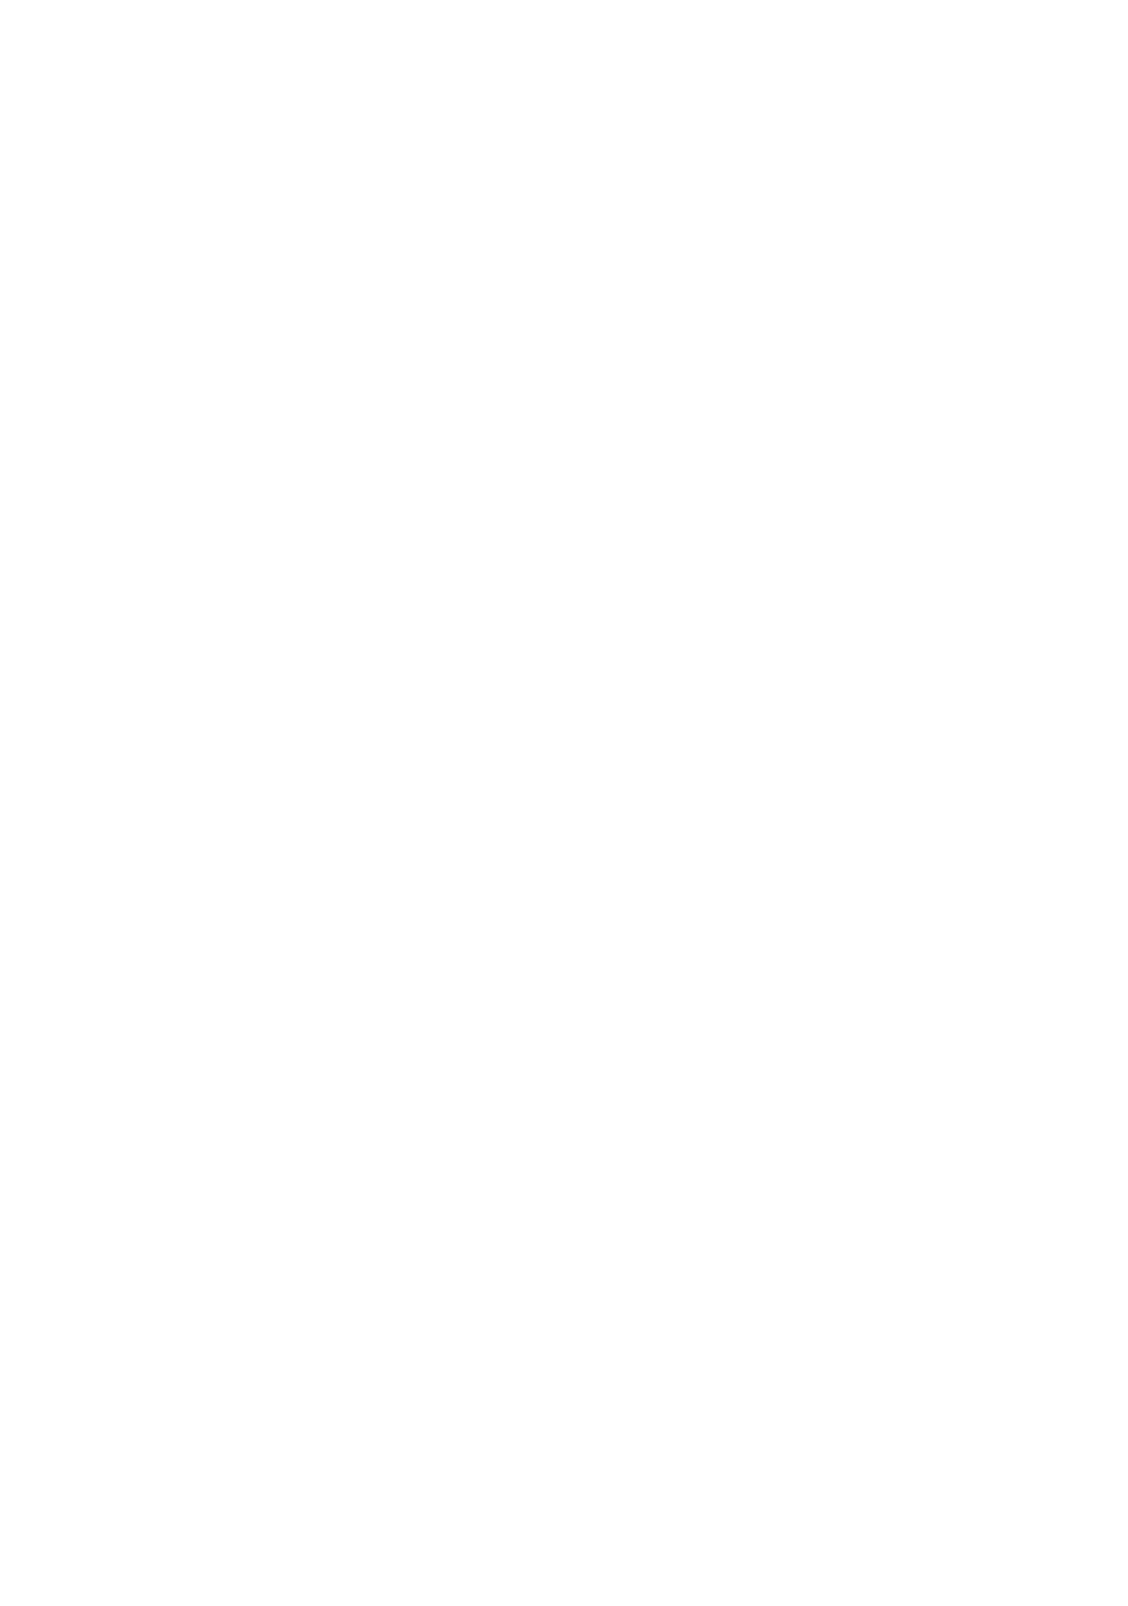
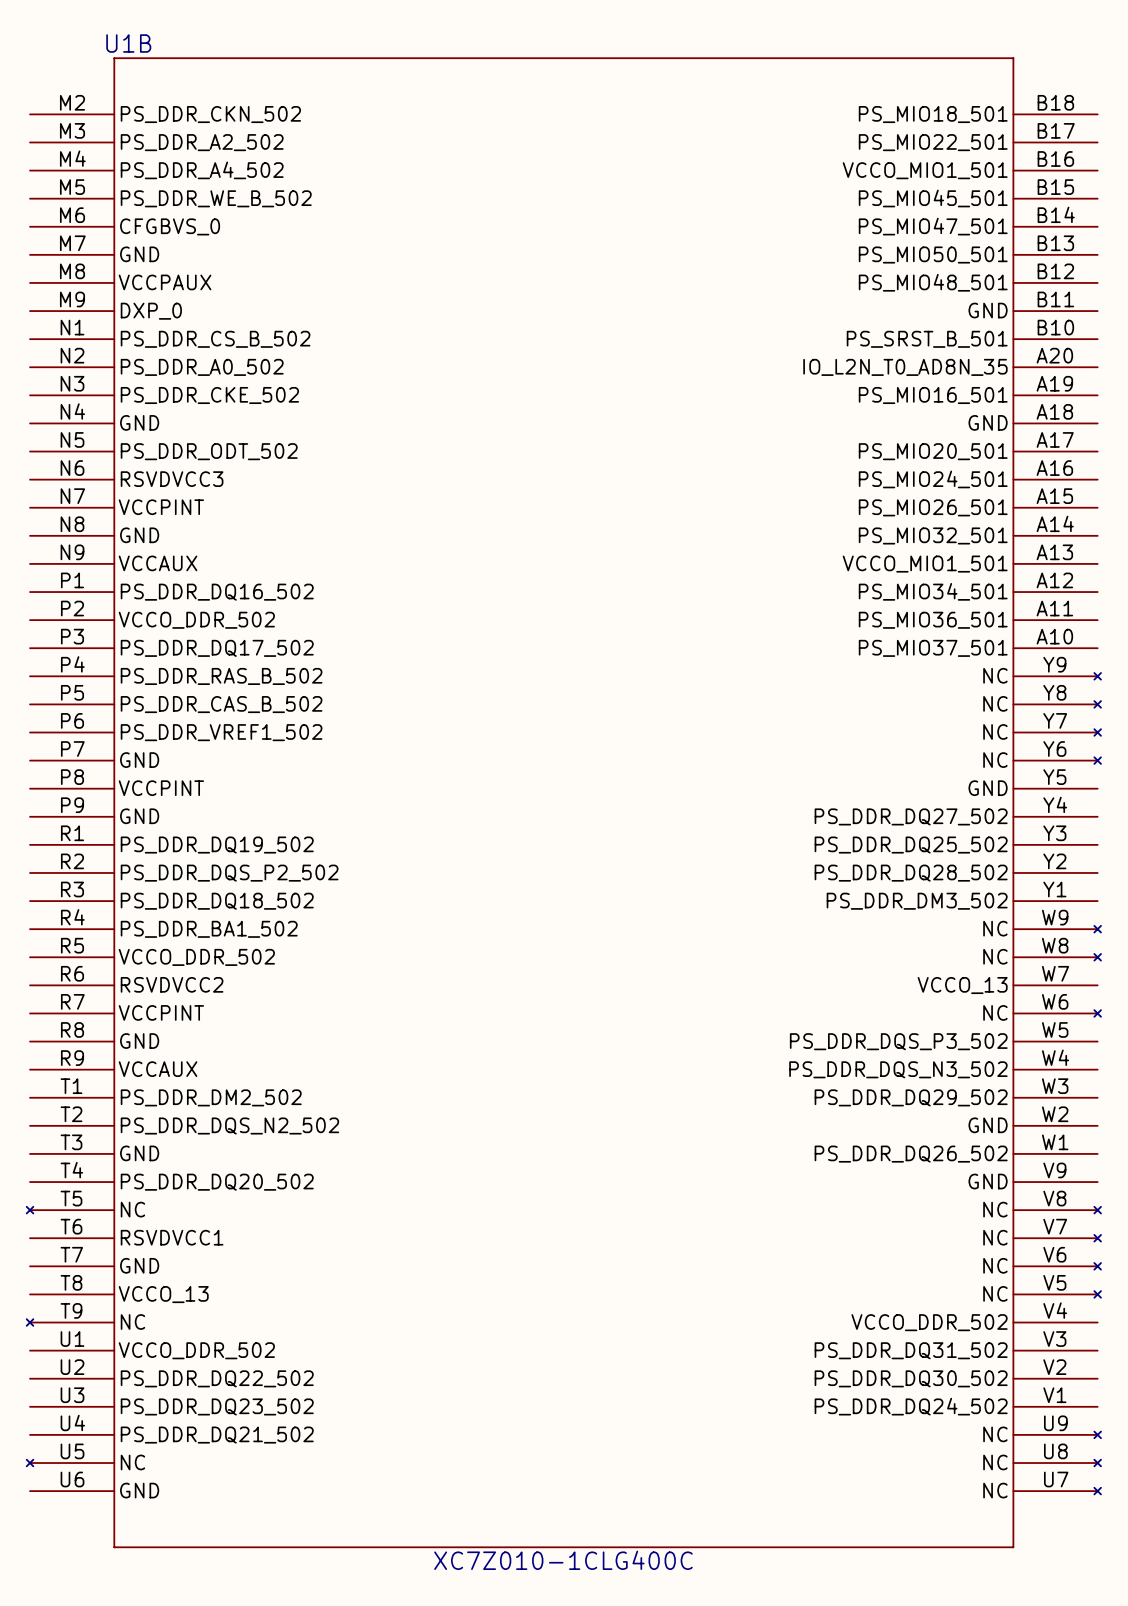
U1B: none -> XC7Z010-1CLG400C (563, 802)

